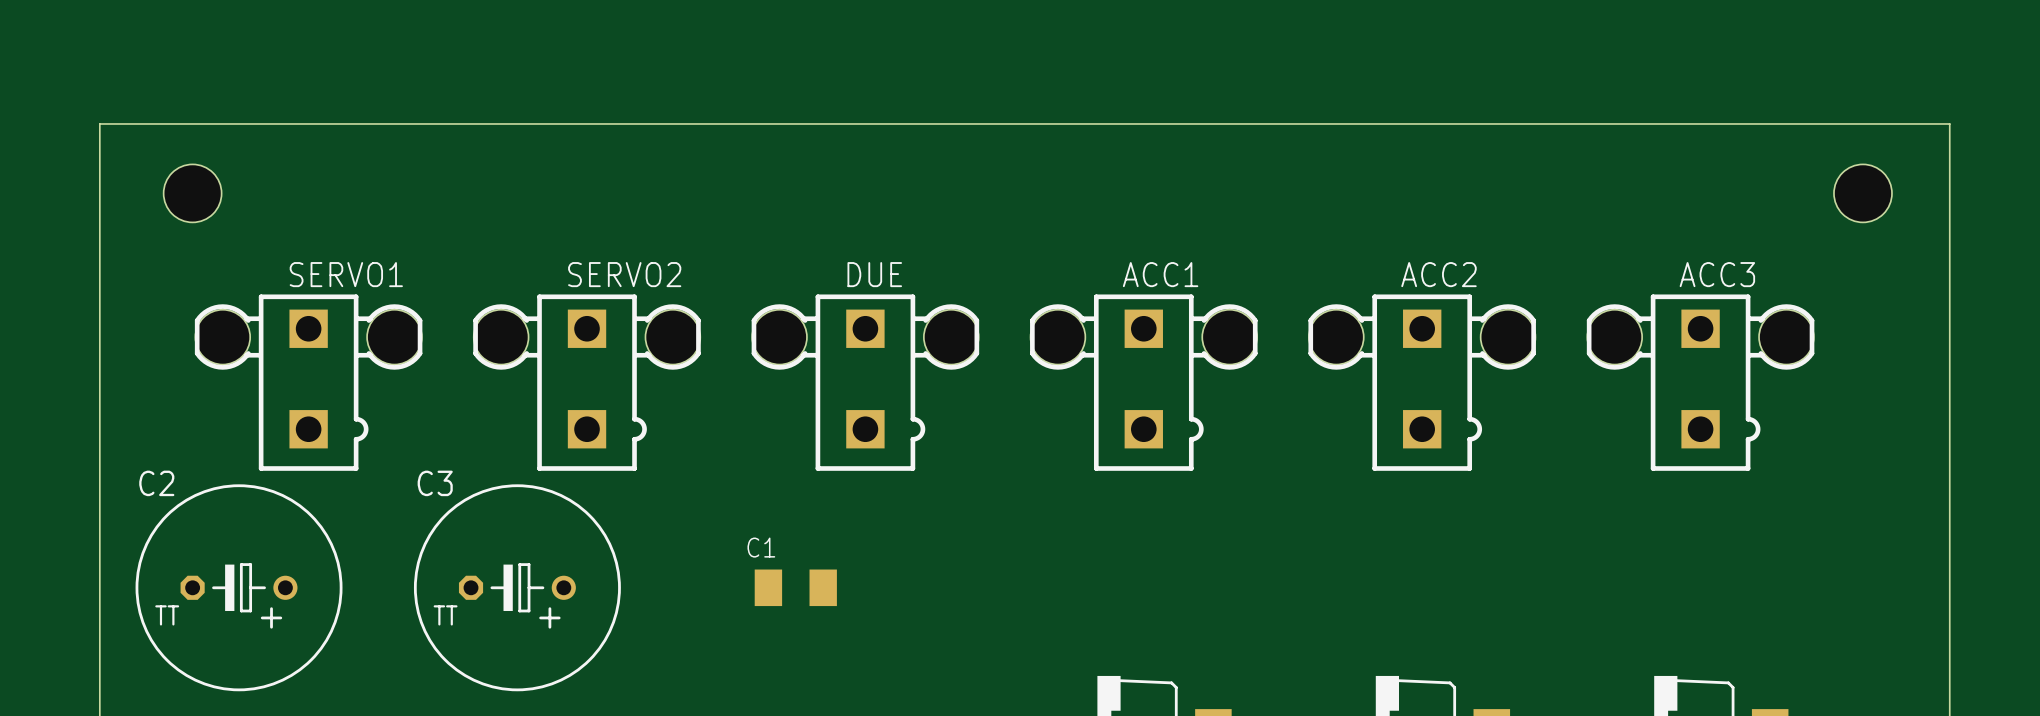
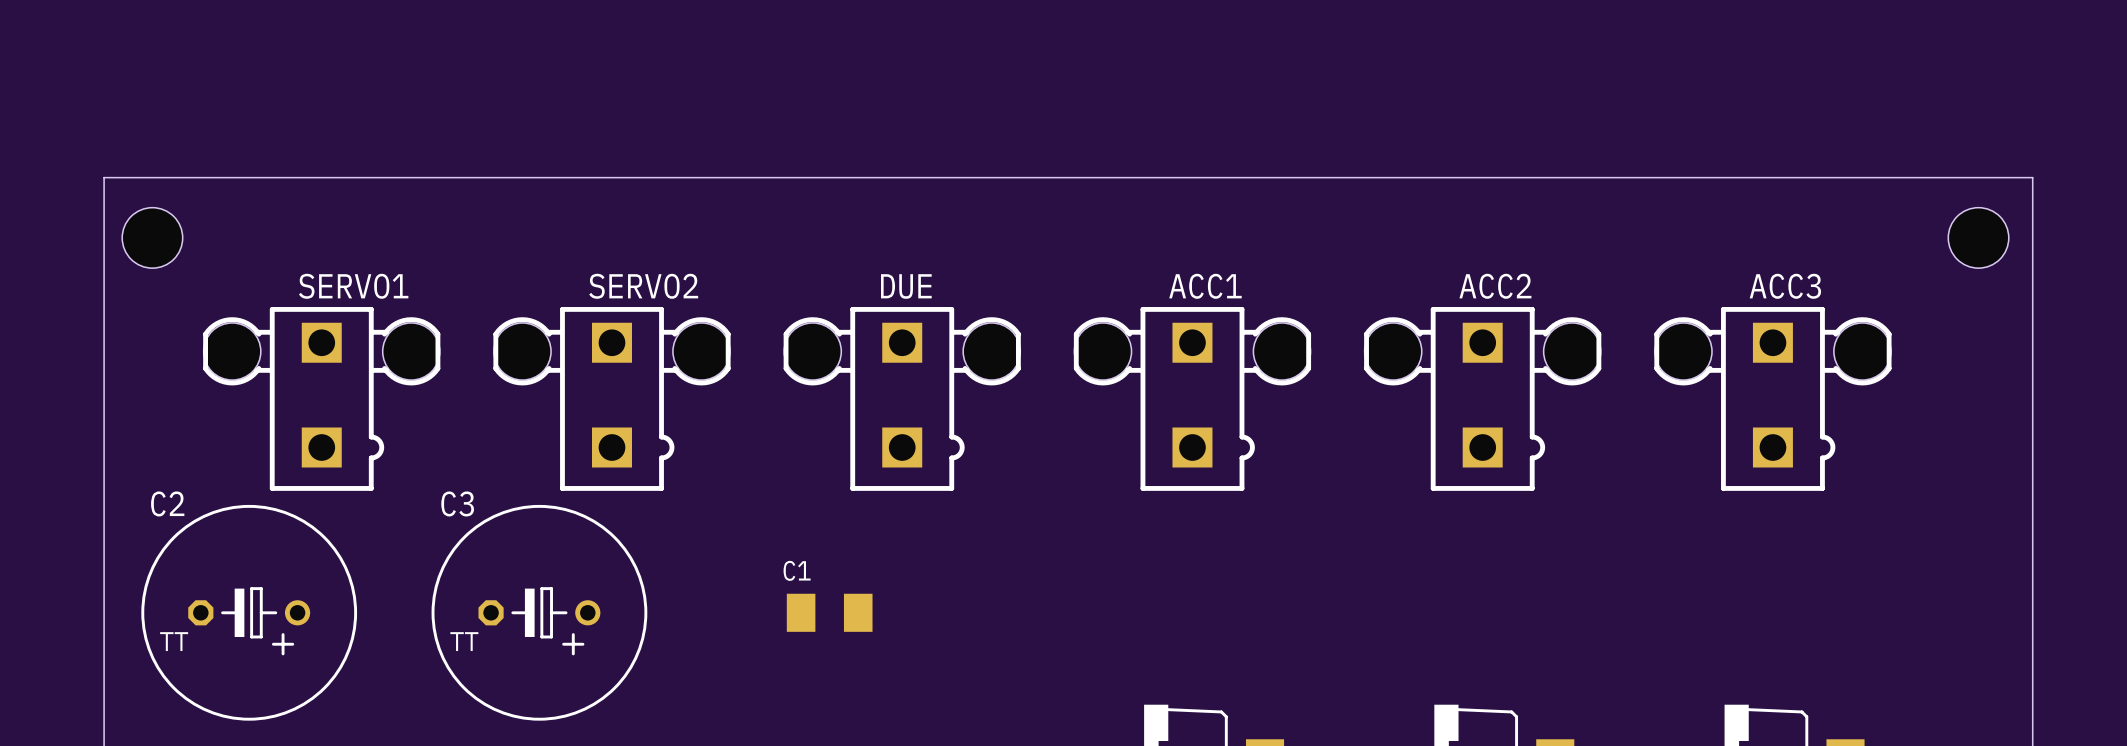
board edge: (99, 170) (99, 123) (1949, 123) (1949, 170) -> (104, 177) (2032, 177)
hole position: (192, 193) -> (152, 237)
hole position: (1862, 193) -> (1978, 237)

